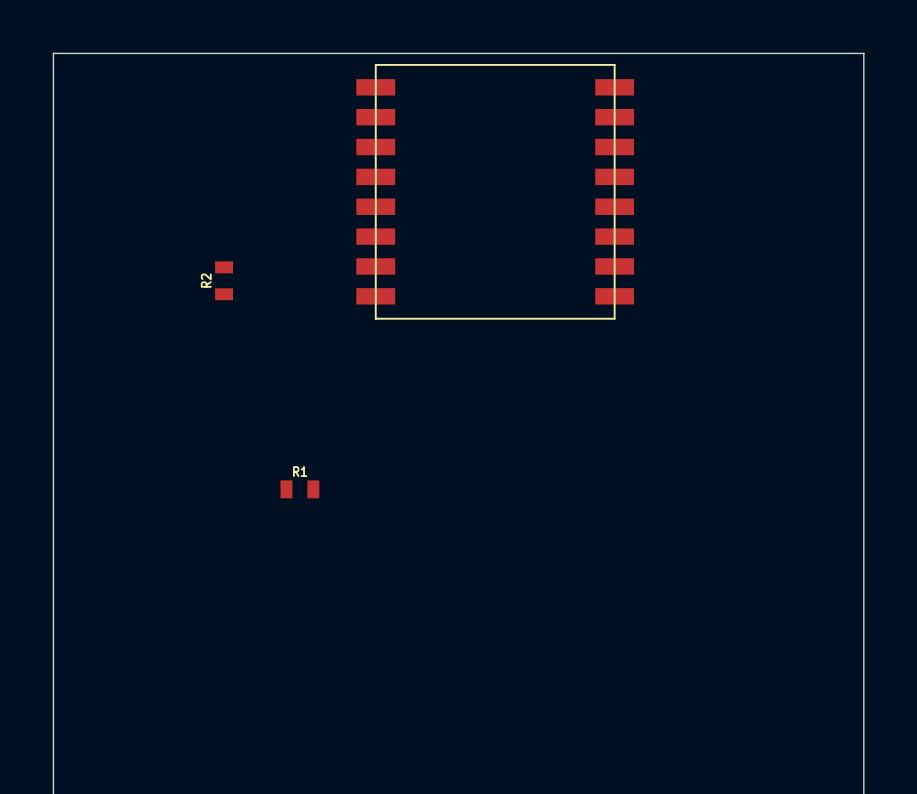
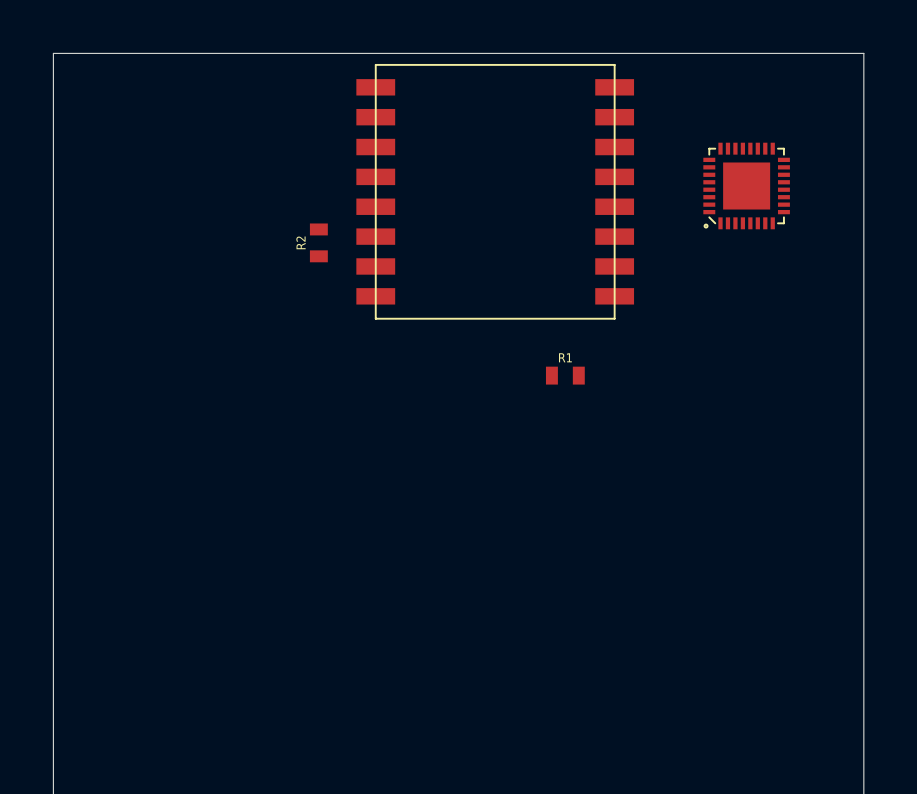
part: none -> (746, 186)
R2 position: (224, 280) -> (318, 242)
R1 position: (299, 489) -> (565, 375)

